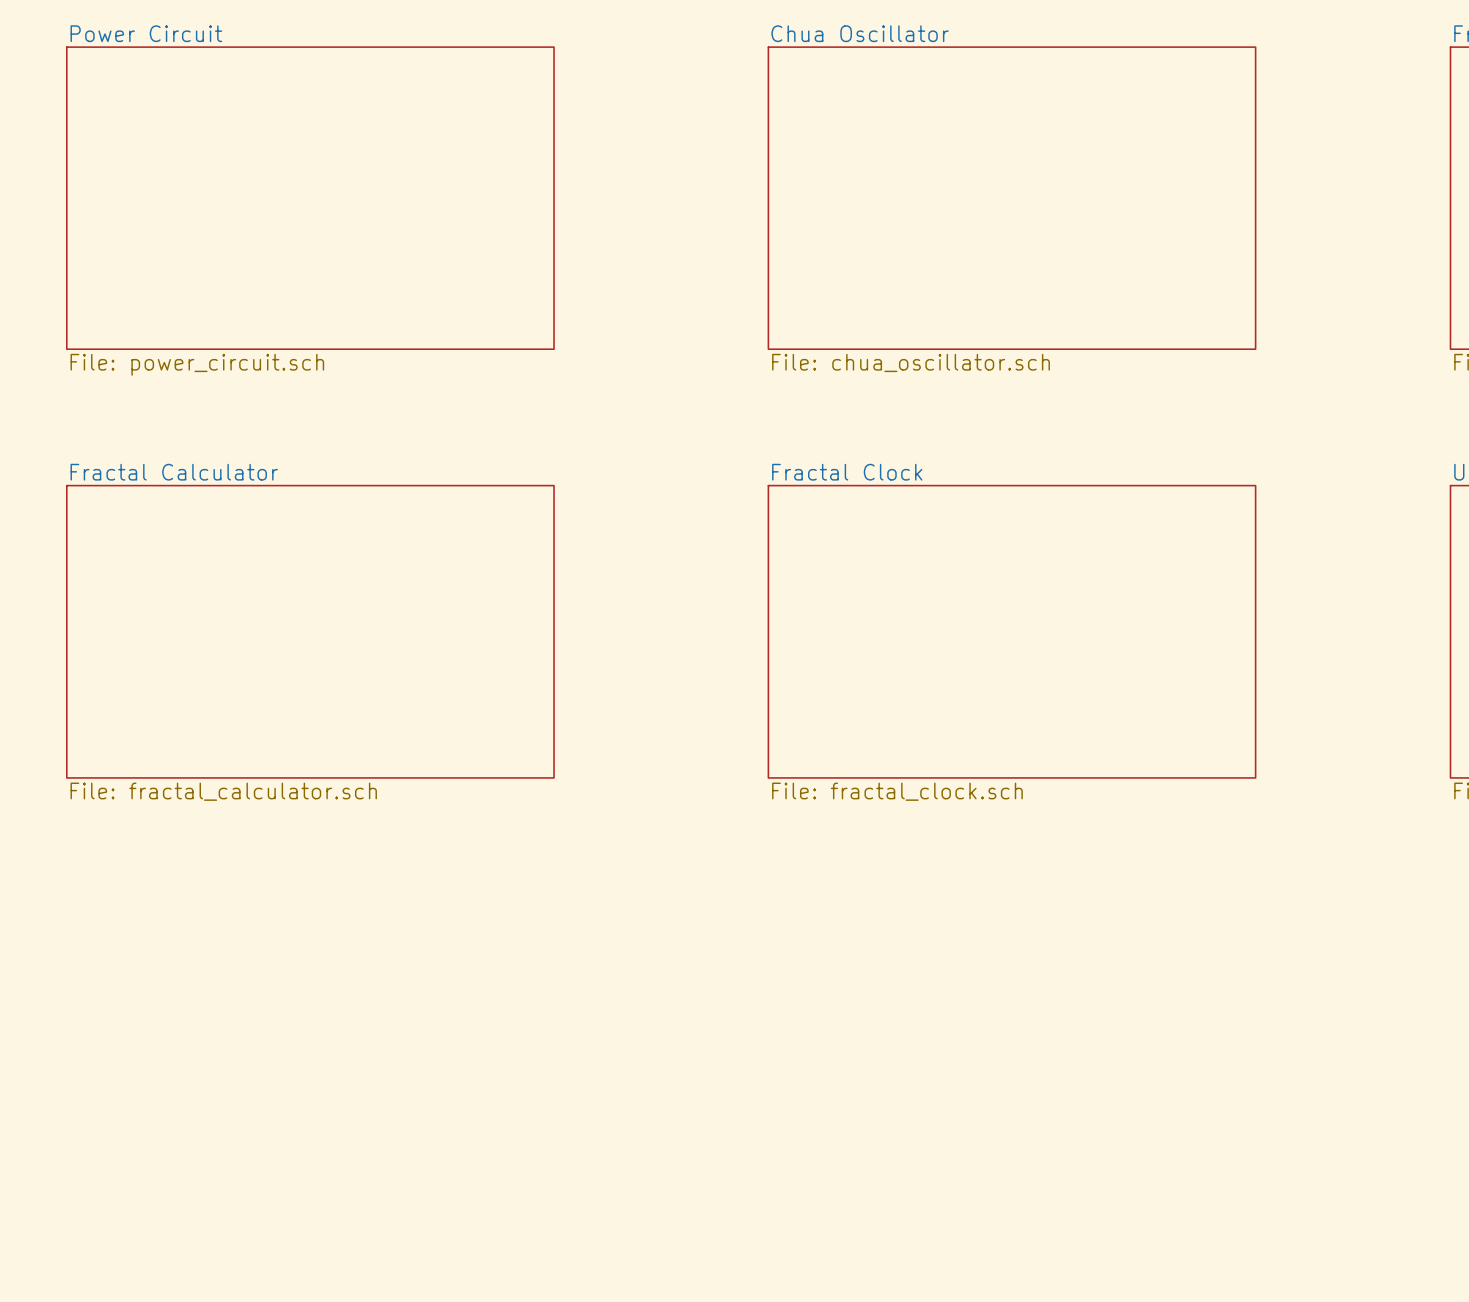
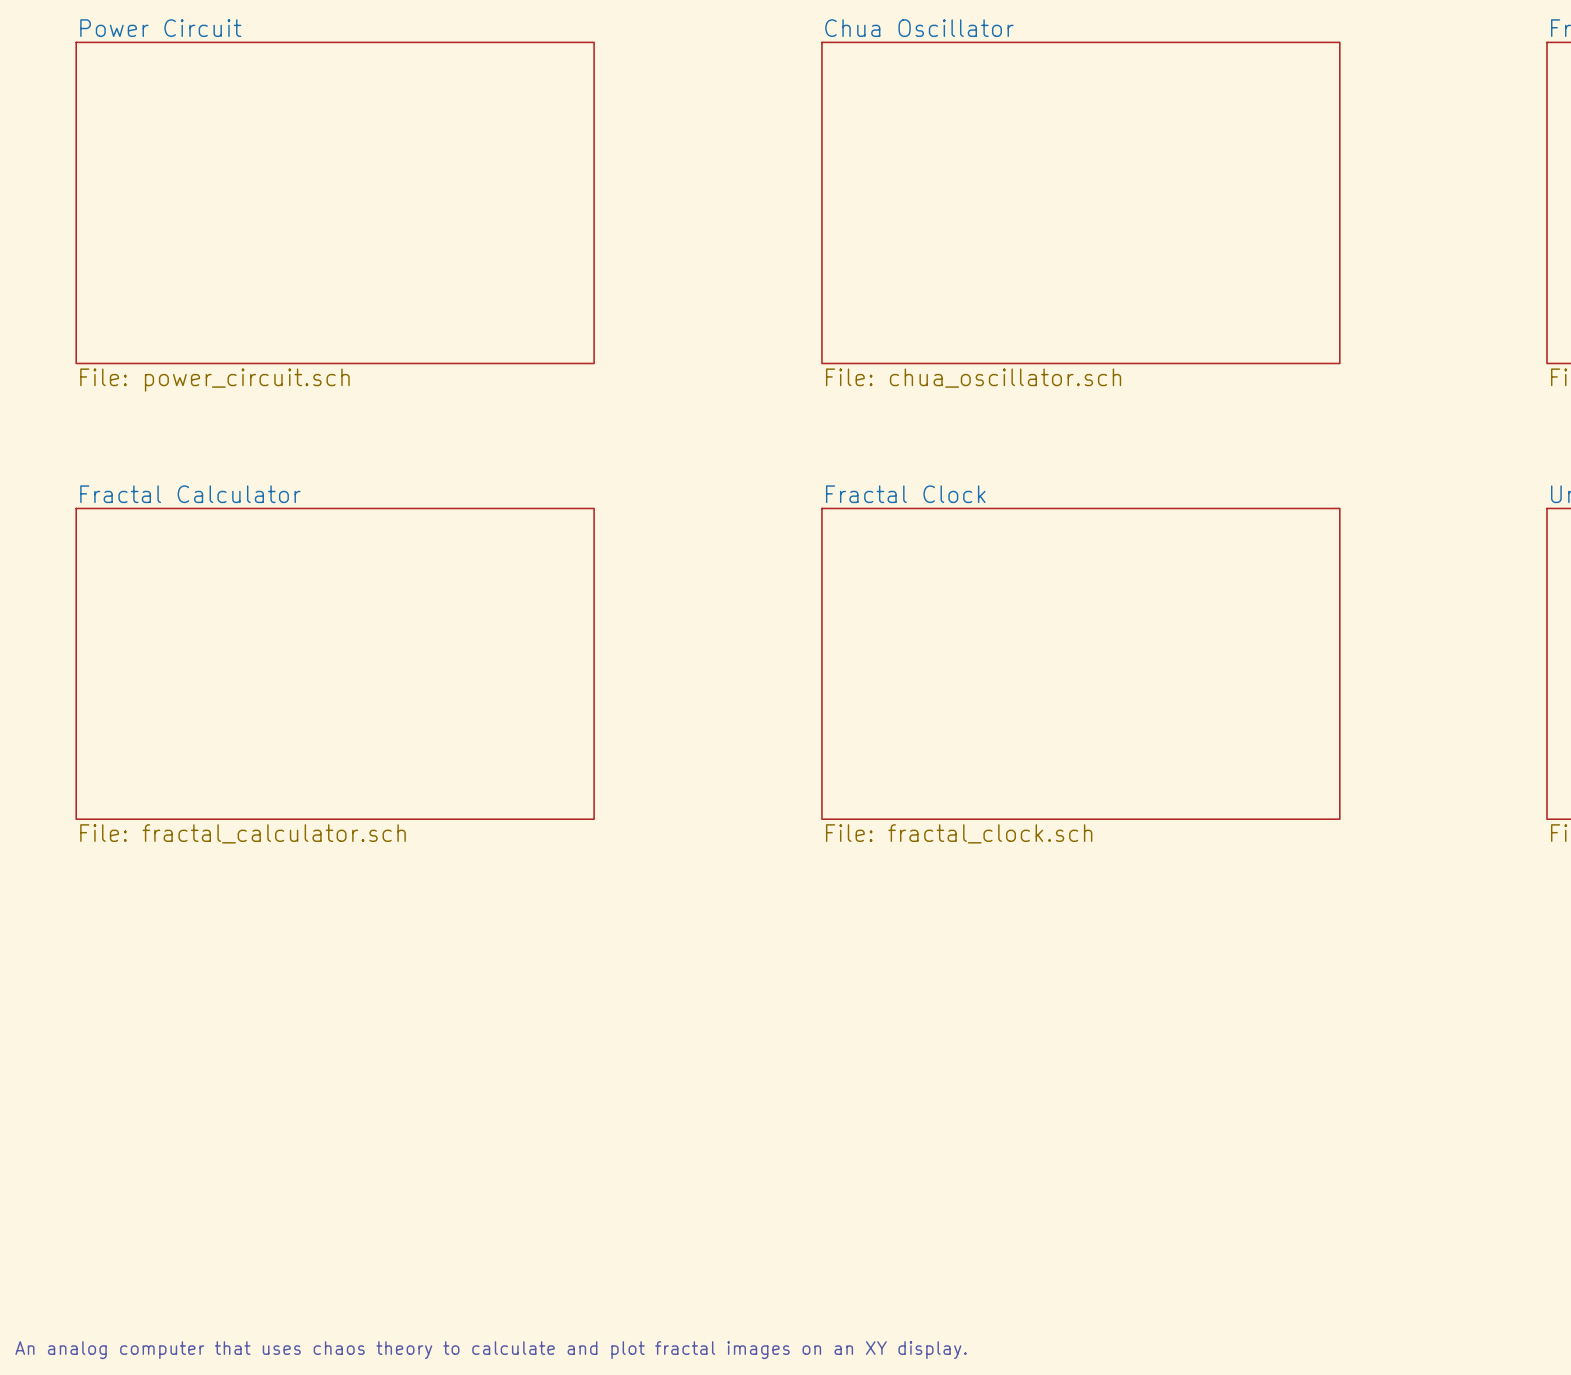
text: none -> An analog computer that uses chaos theory to calculate and plot fractal images on an XY display. (491, 1350)

